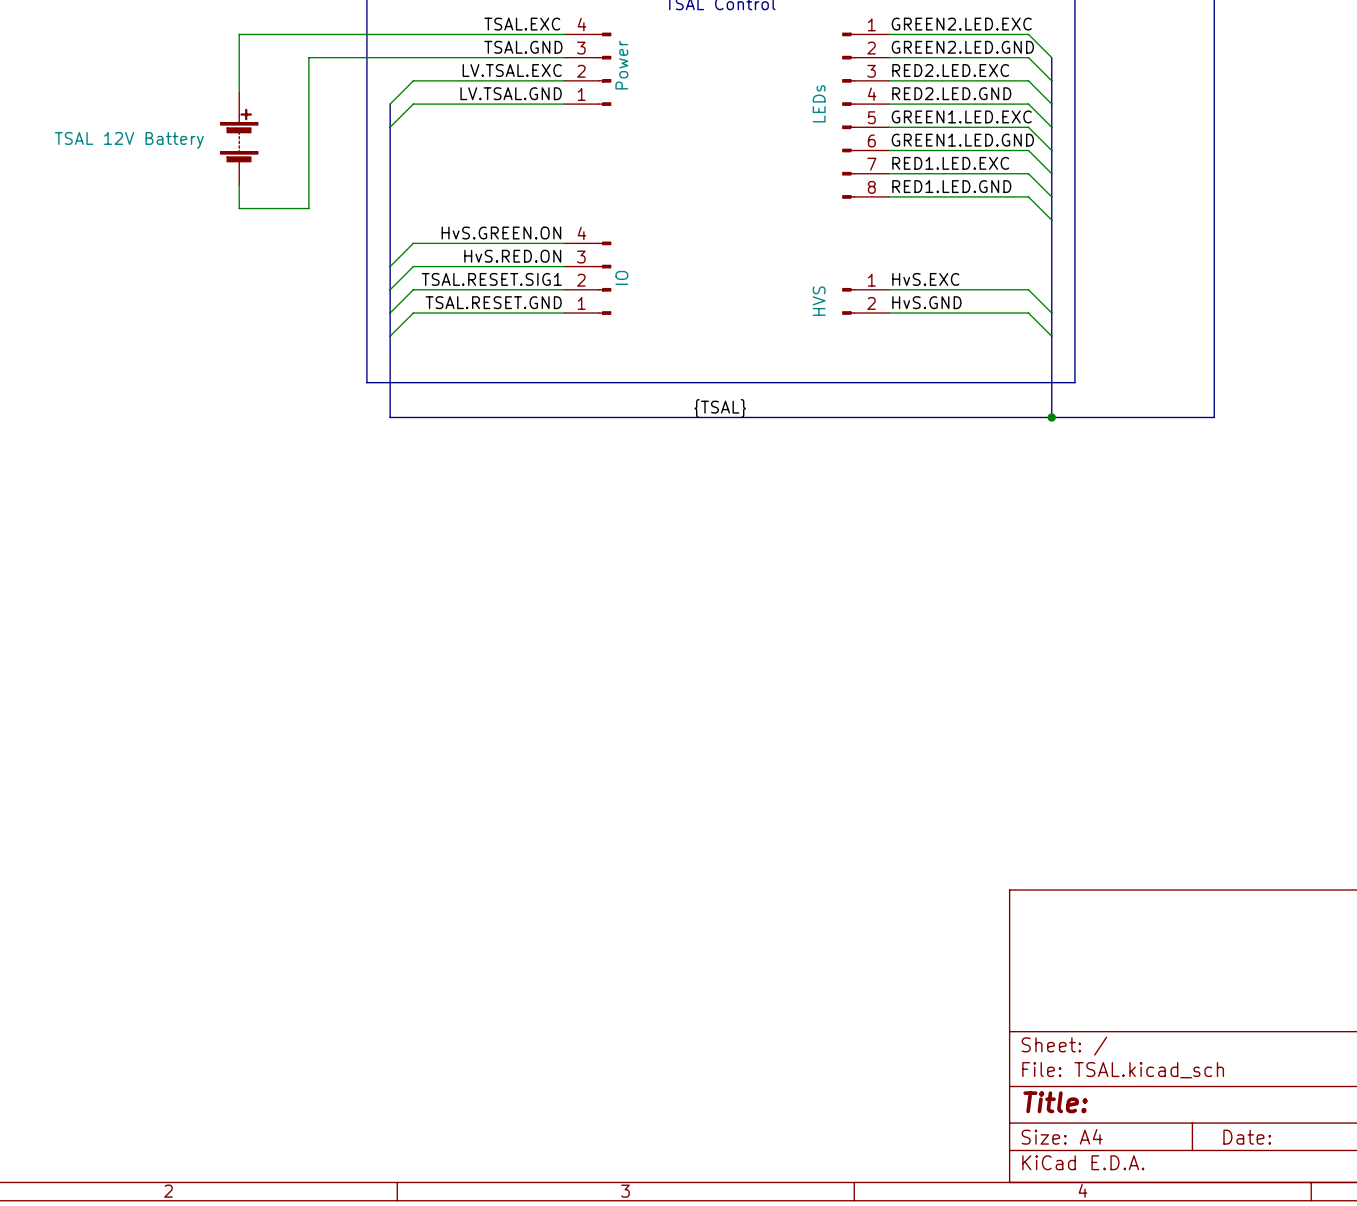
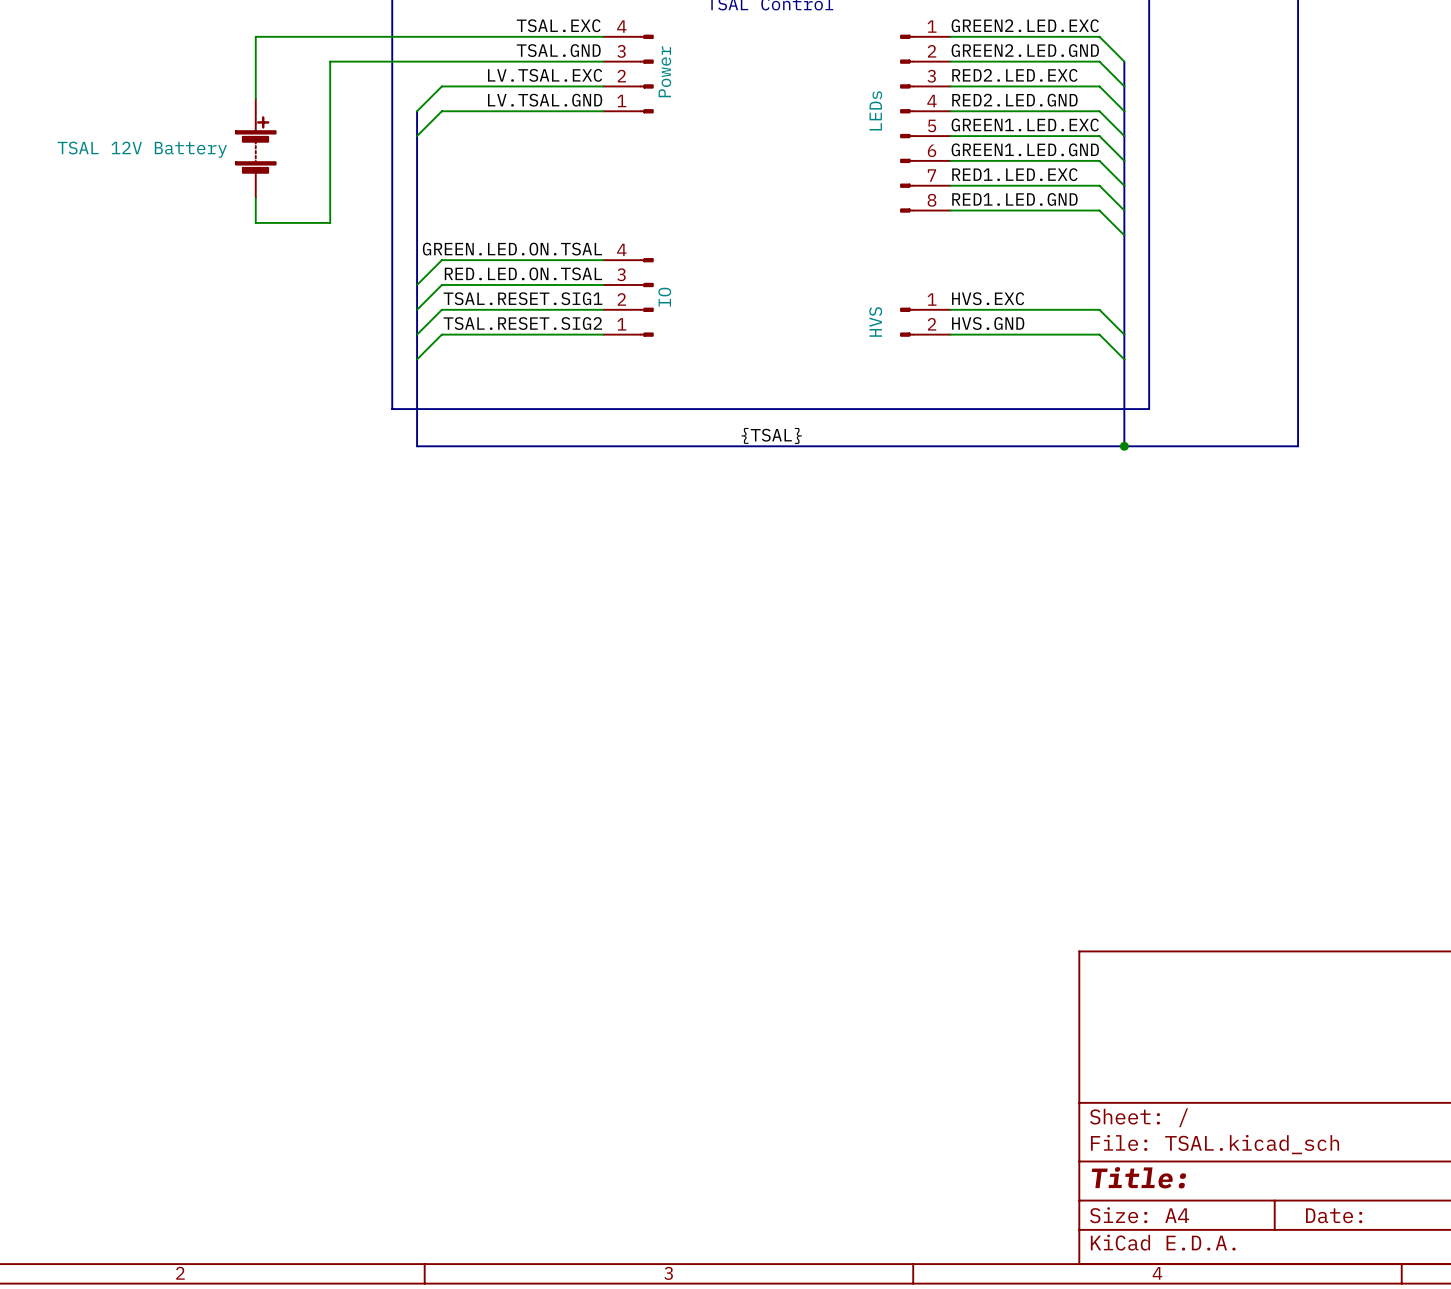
label: HvS.GREEN.ON (501, 233) -> GREEN.LED.ON.TSAL (512, 249)
label: HvS.RED.ON (512, 256) -> RED.LED.ON.TSAL (523, 273)
label: HvS.EXC (925, 279) -> HVS.EXC (988, 298)
label: TSAL.RESET.GND (493, 302) -> TSAL.RESET.SIG2 (522, 323)
label: HvS.GND (926, 302) -> HVS.GND (988, 323)

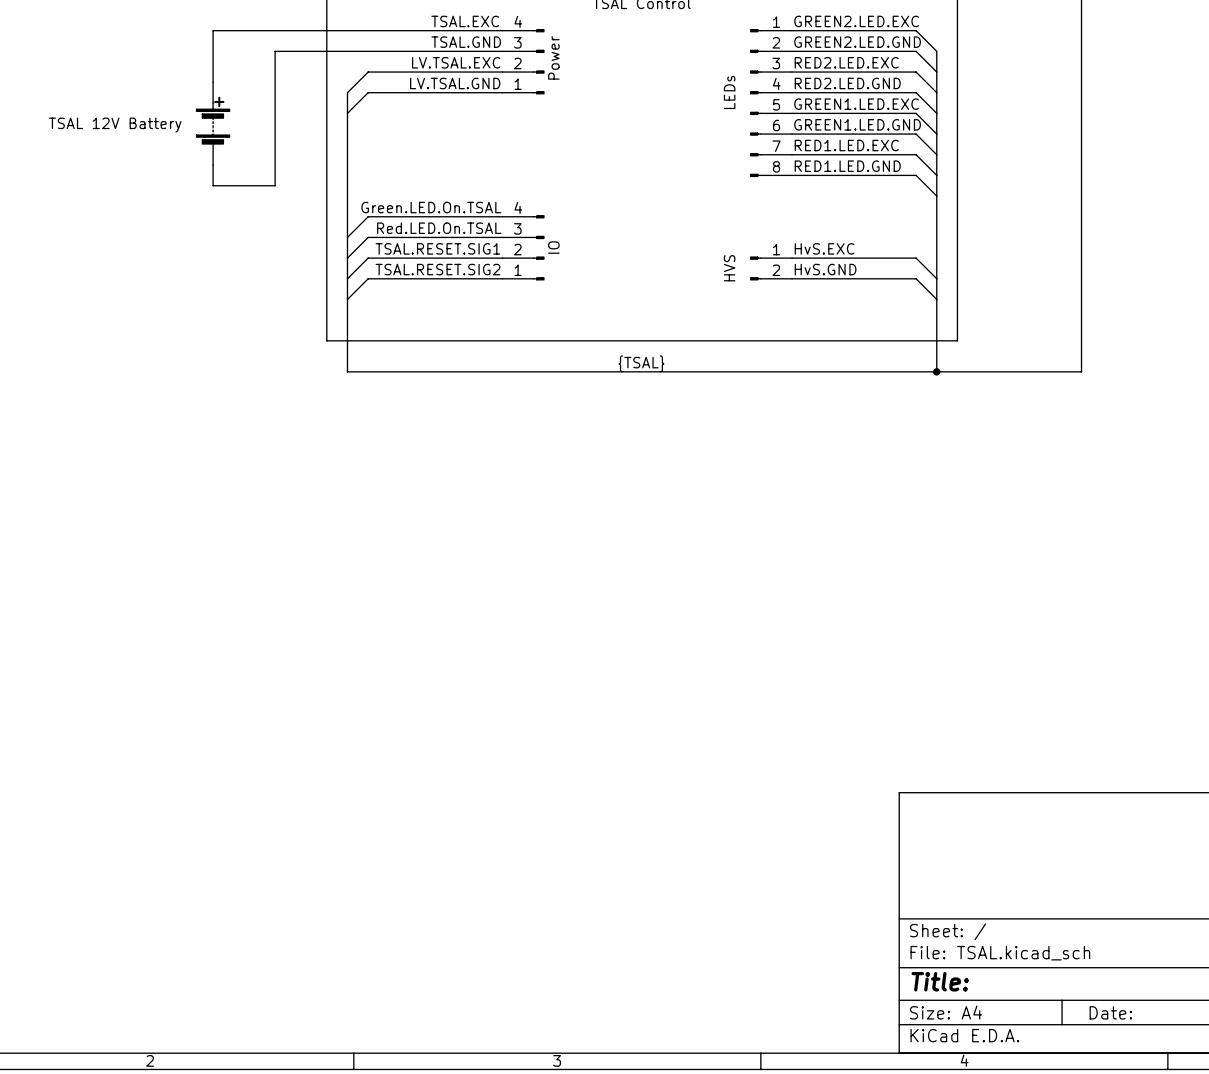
label: GREEN.LED.ON.TSAL (512, 249) -> Green.LED.On.TSAL (431, 207)
label: RED.LED.ON.TSAL (523, 273) -> Red.LED.On.TSAL (439, 228)
label: HVS.EXC (988, 298) -> HvS.EXC (824, 248)
label: HVS.GND (988, 323) -> HvS.GND (825, 269)

